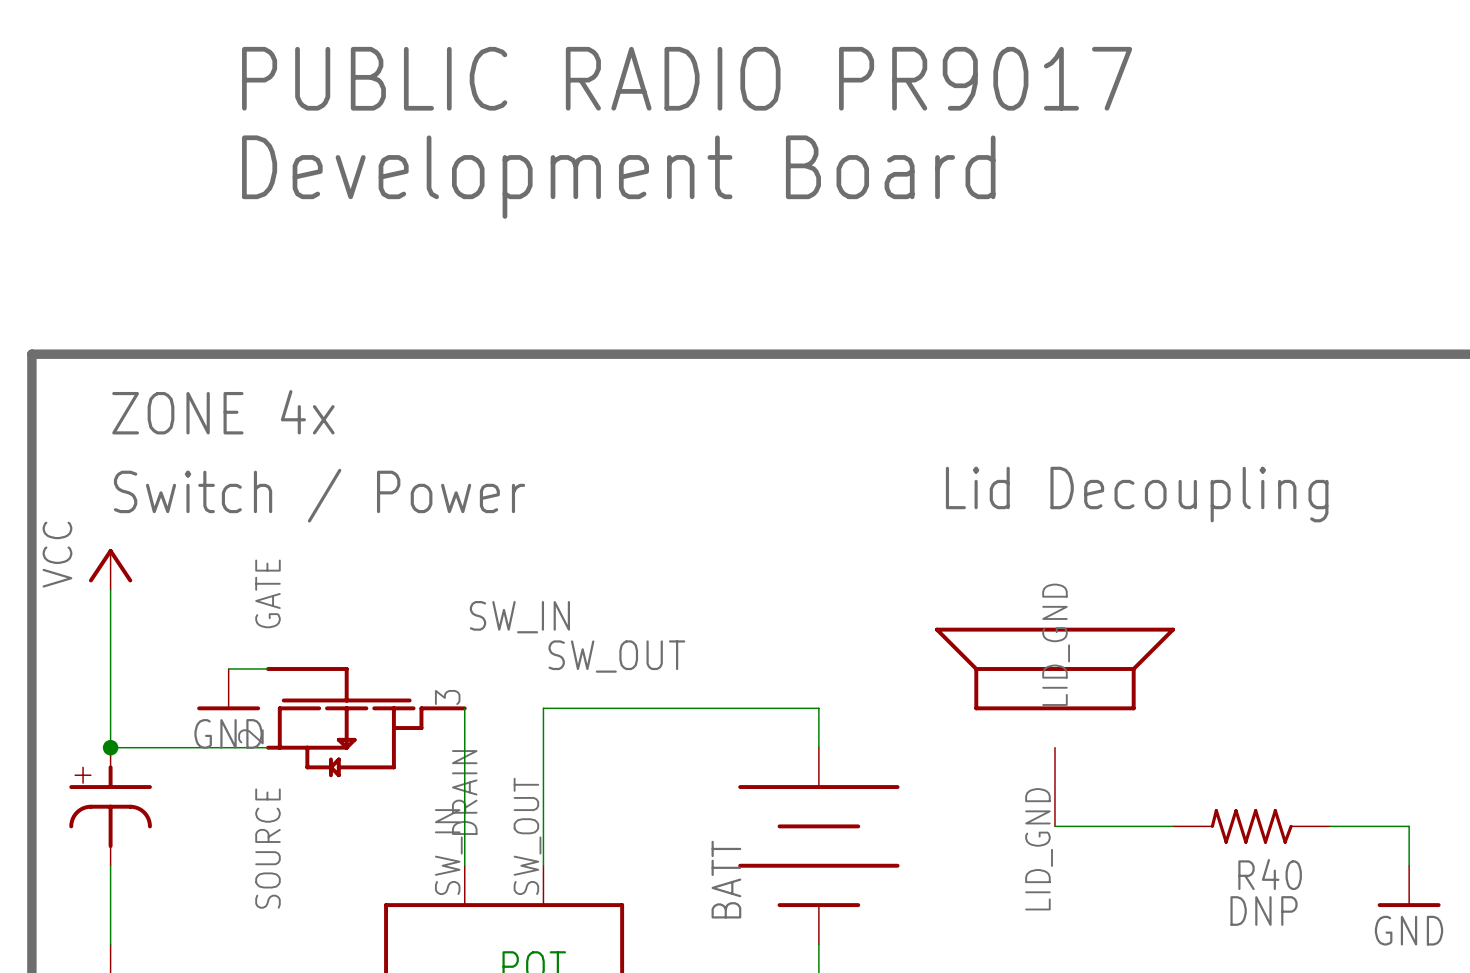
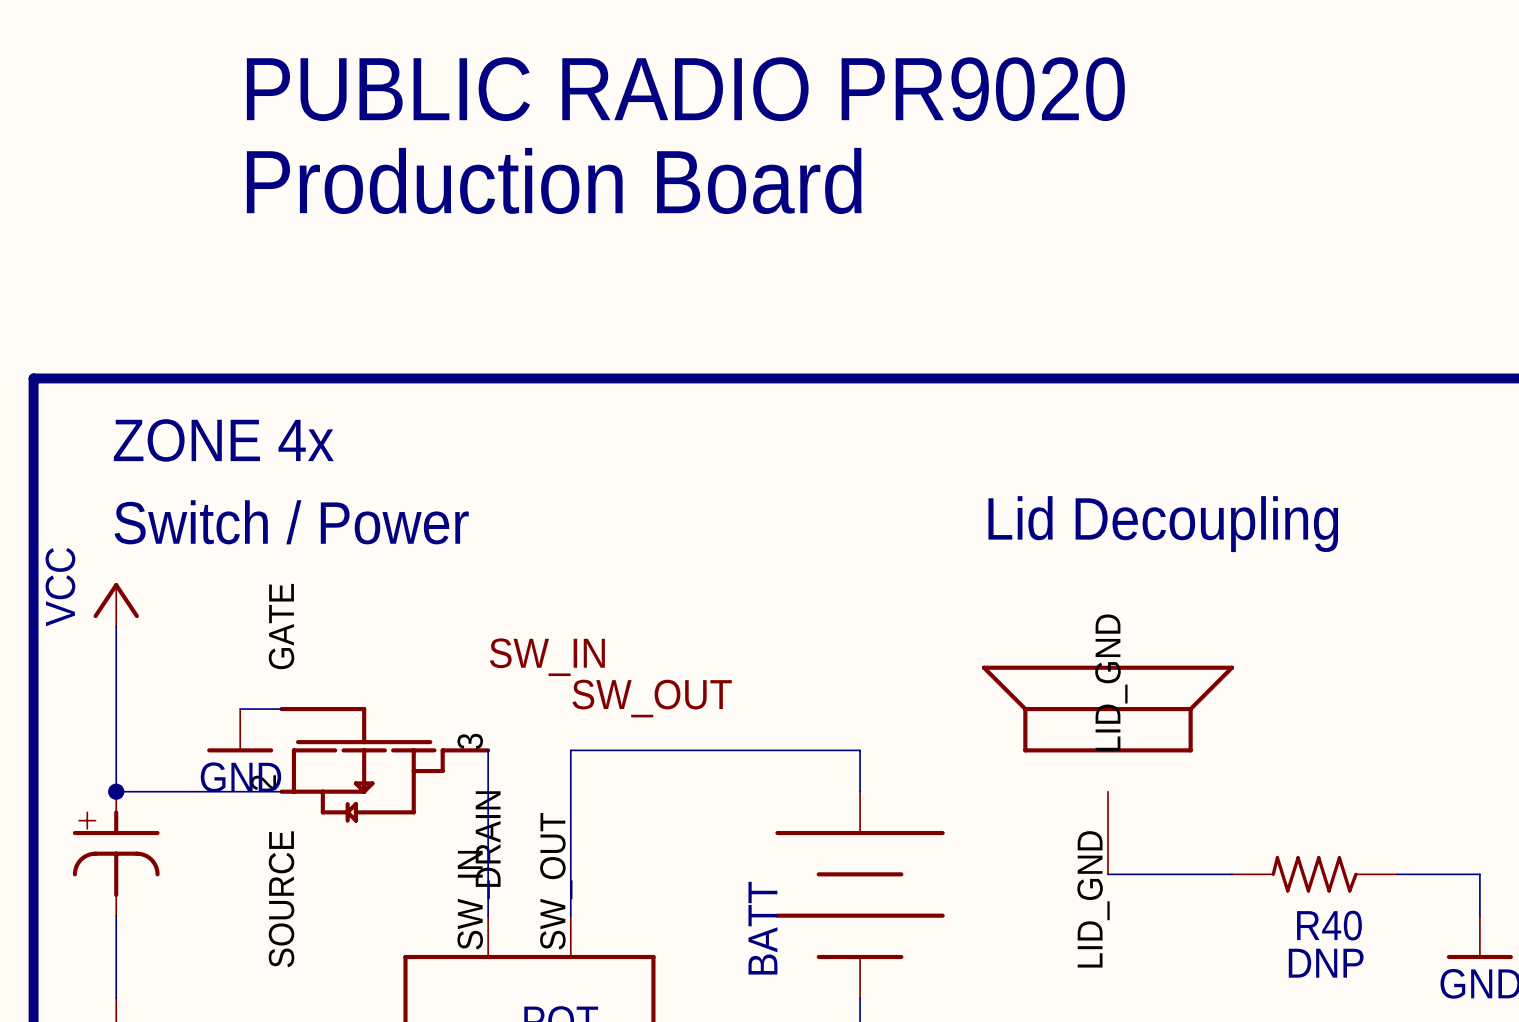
text: PUBLIC RADIO PR9017 (687, 78) -> PUBLIC RADIO PR9020 (685, 89)
text: Development Board (618, 177) -> Production Board (554, 180)

